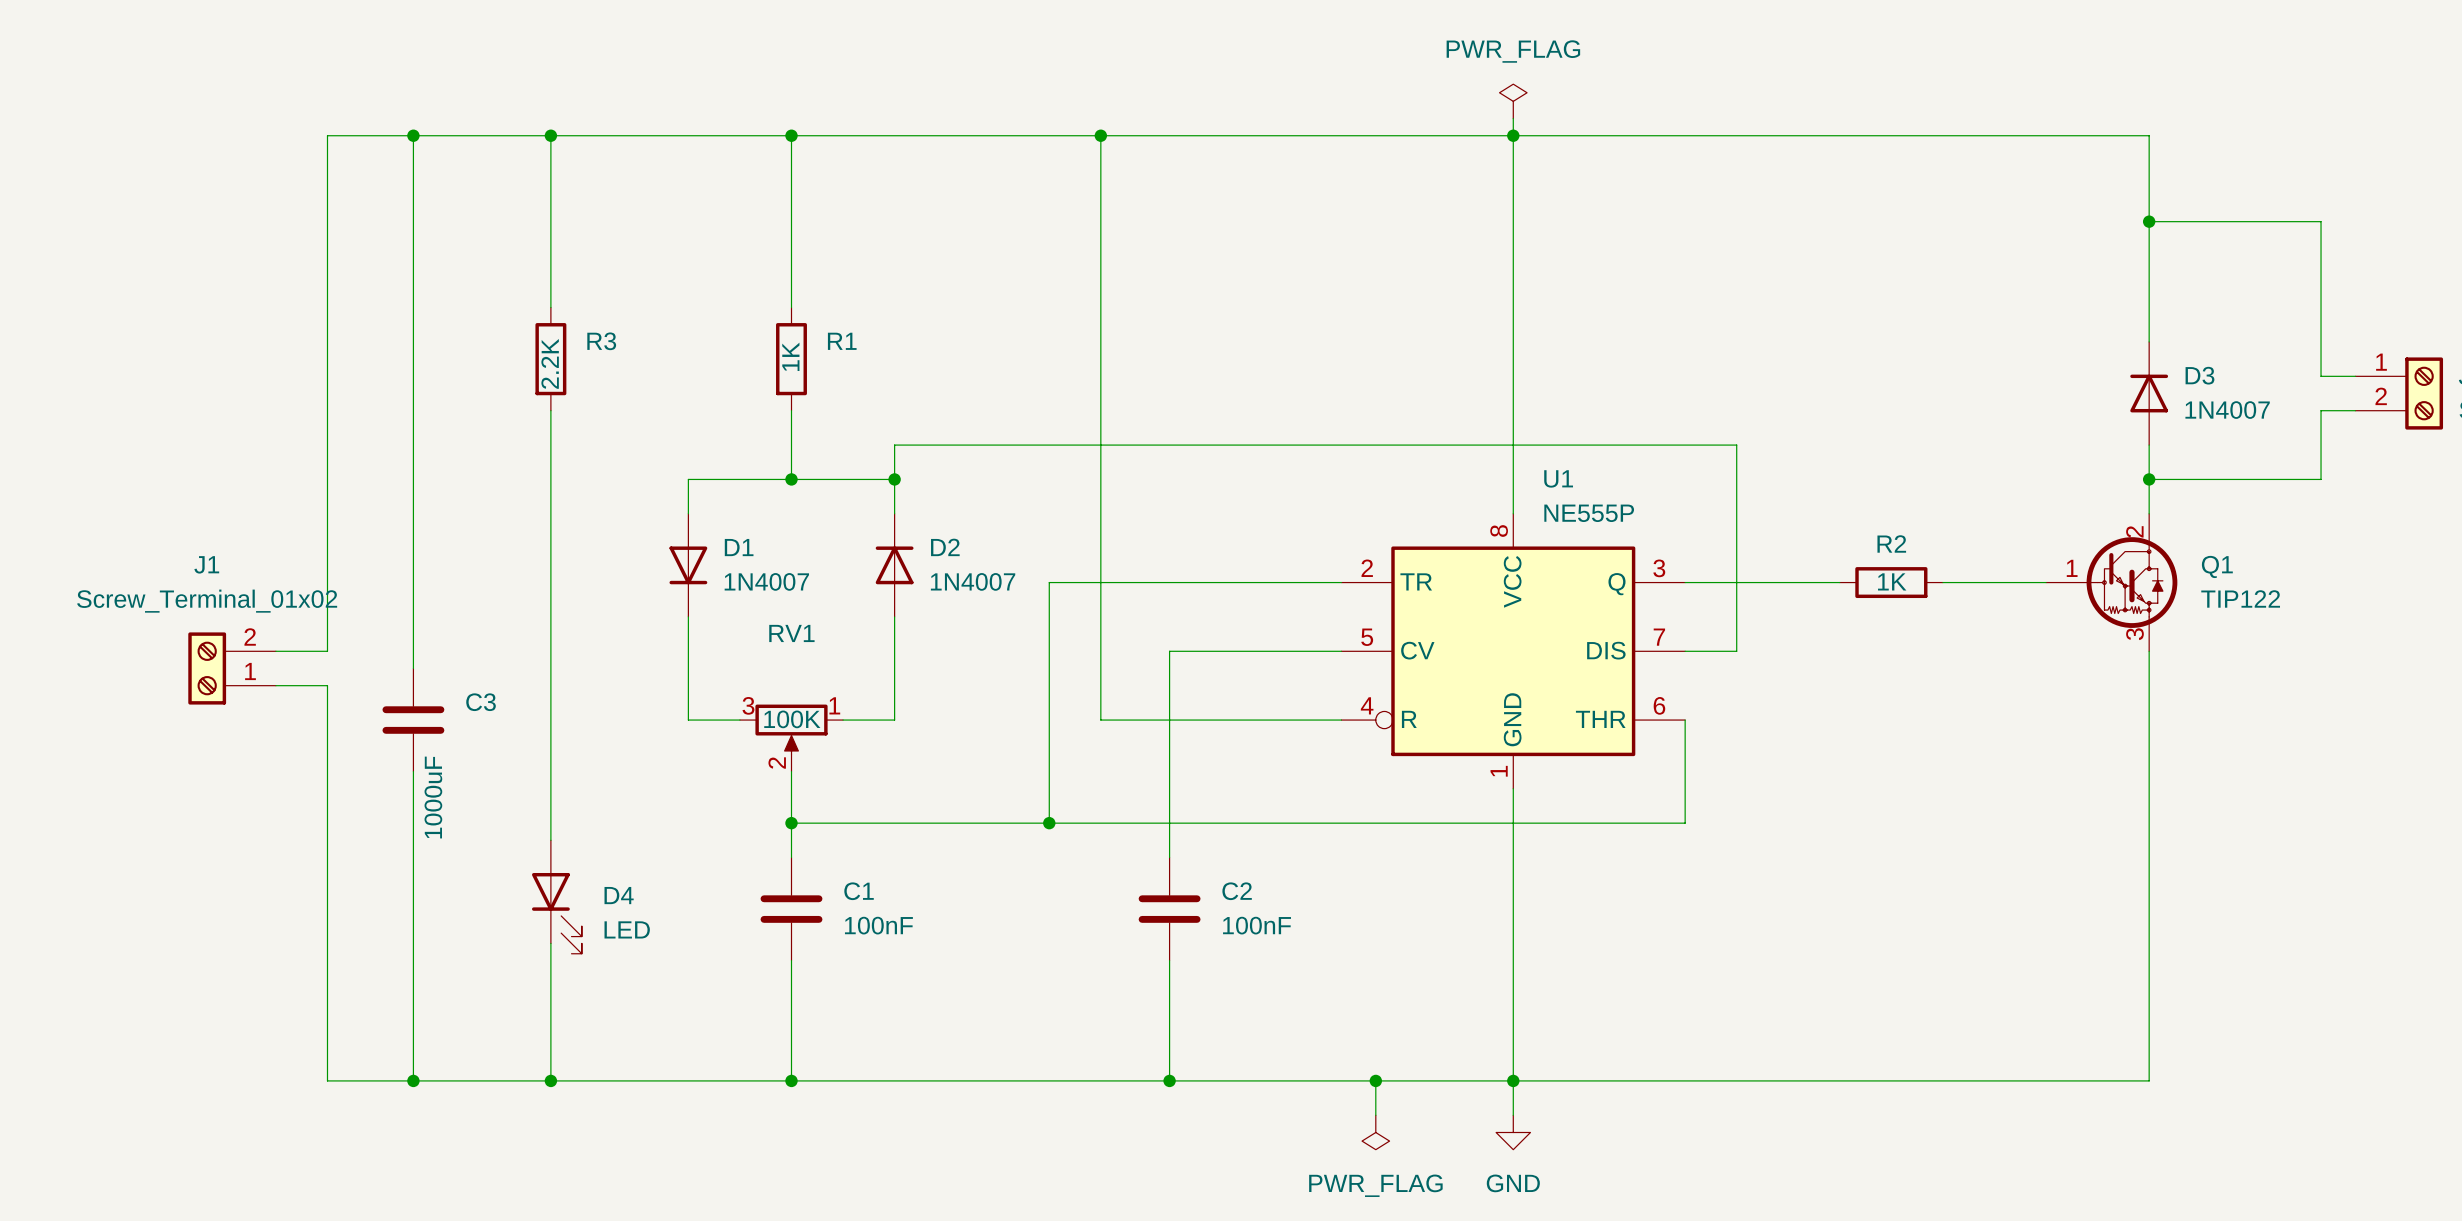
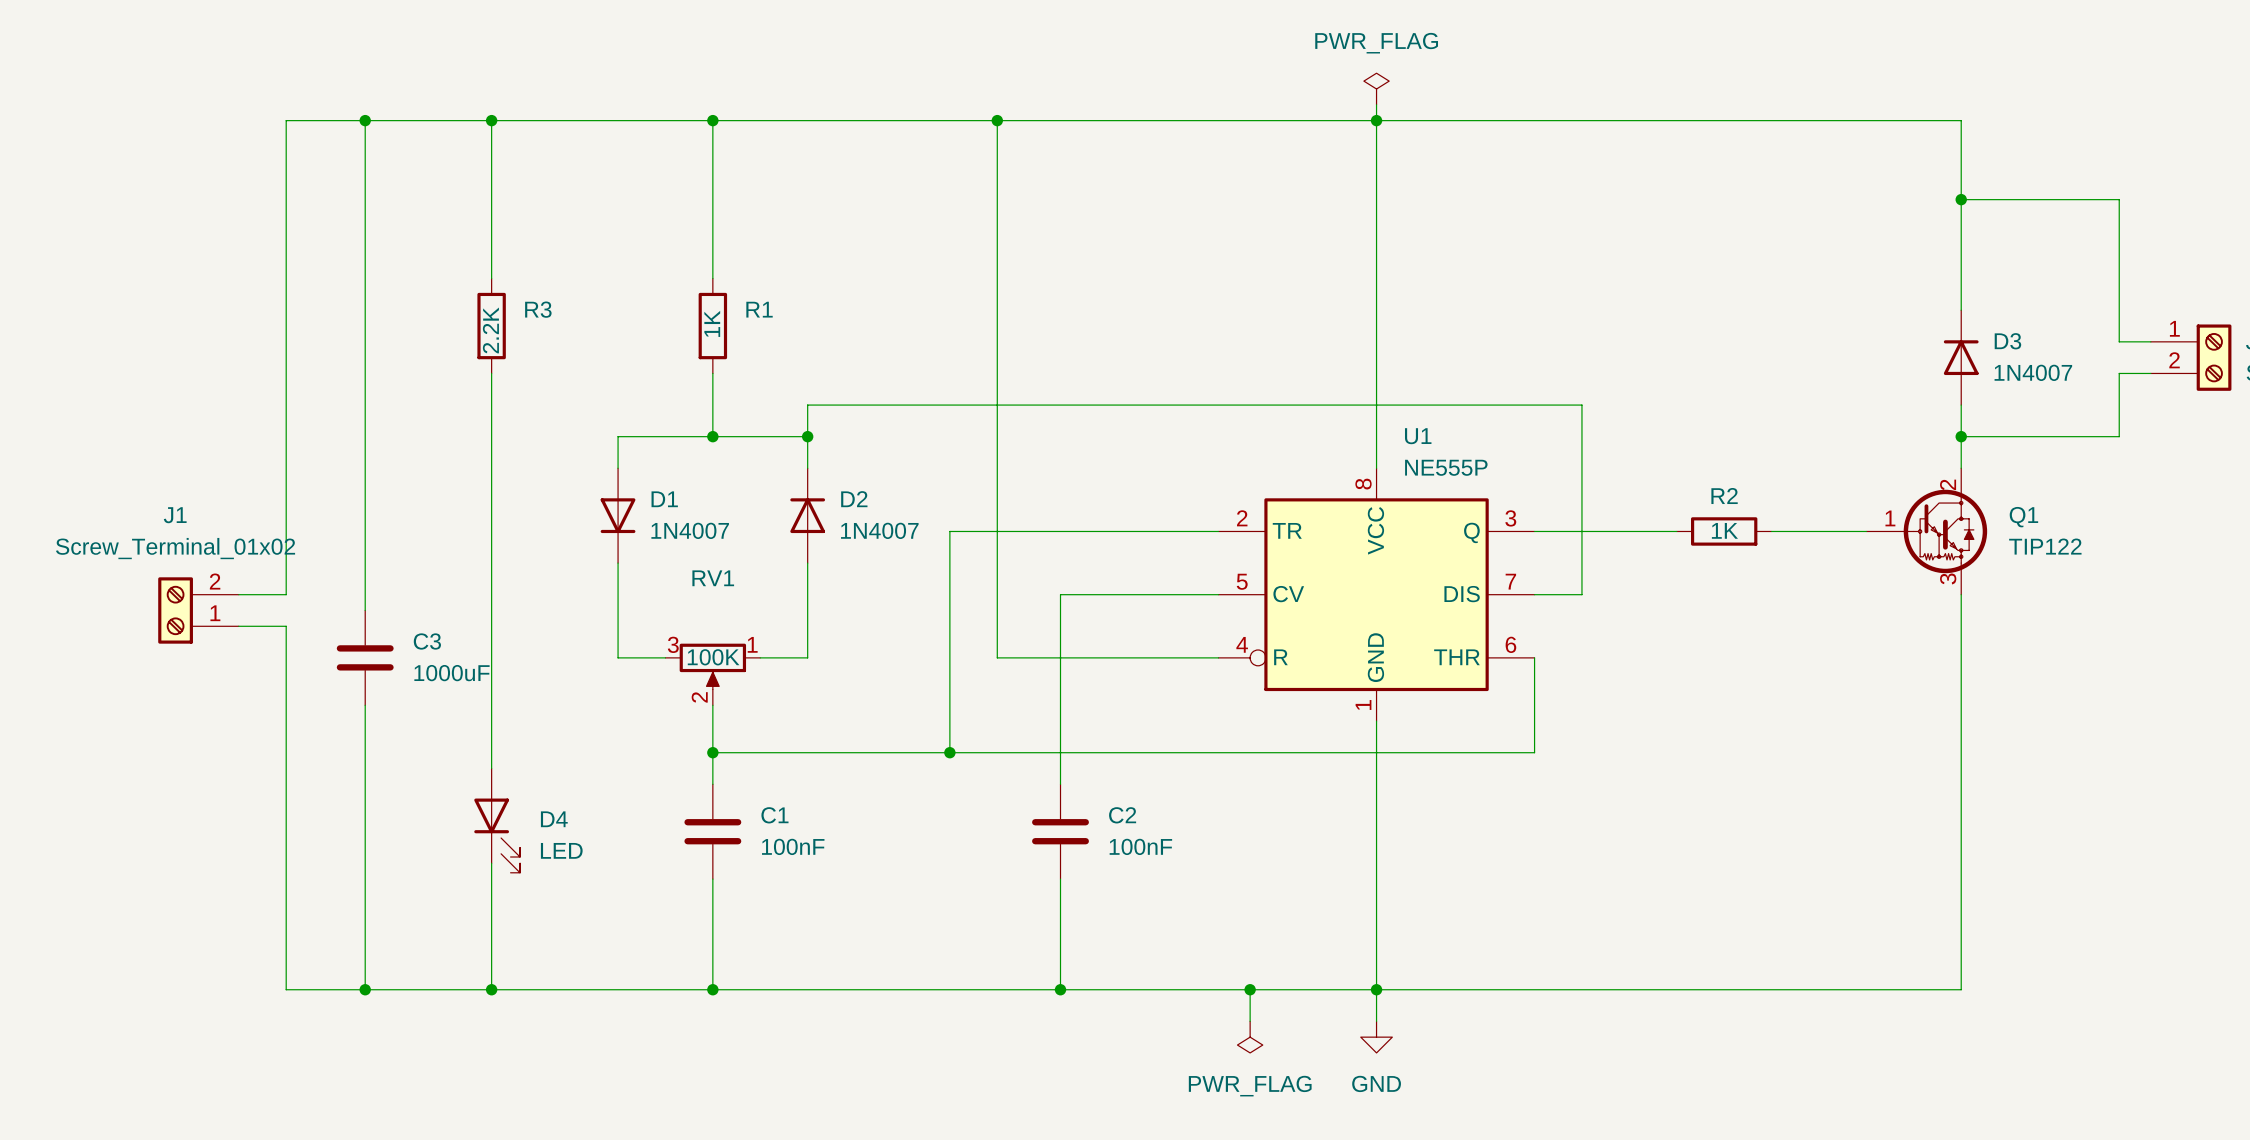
C3 value rotation: 0° (433, 797) -> 90° clockwise (451, 673)

